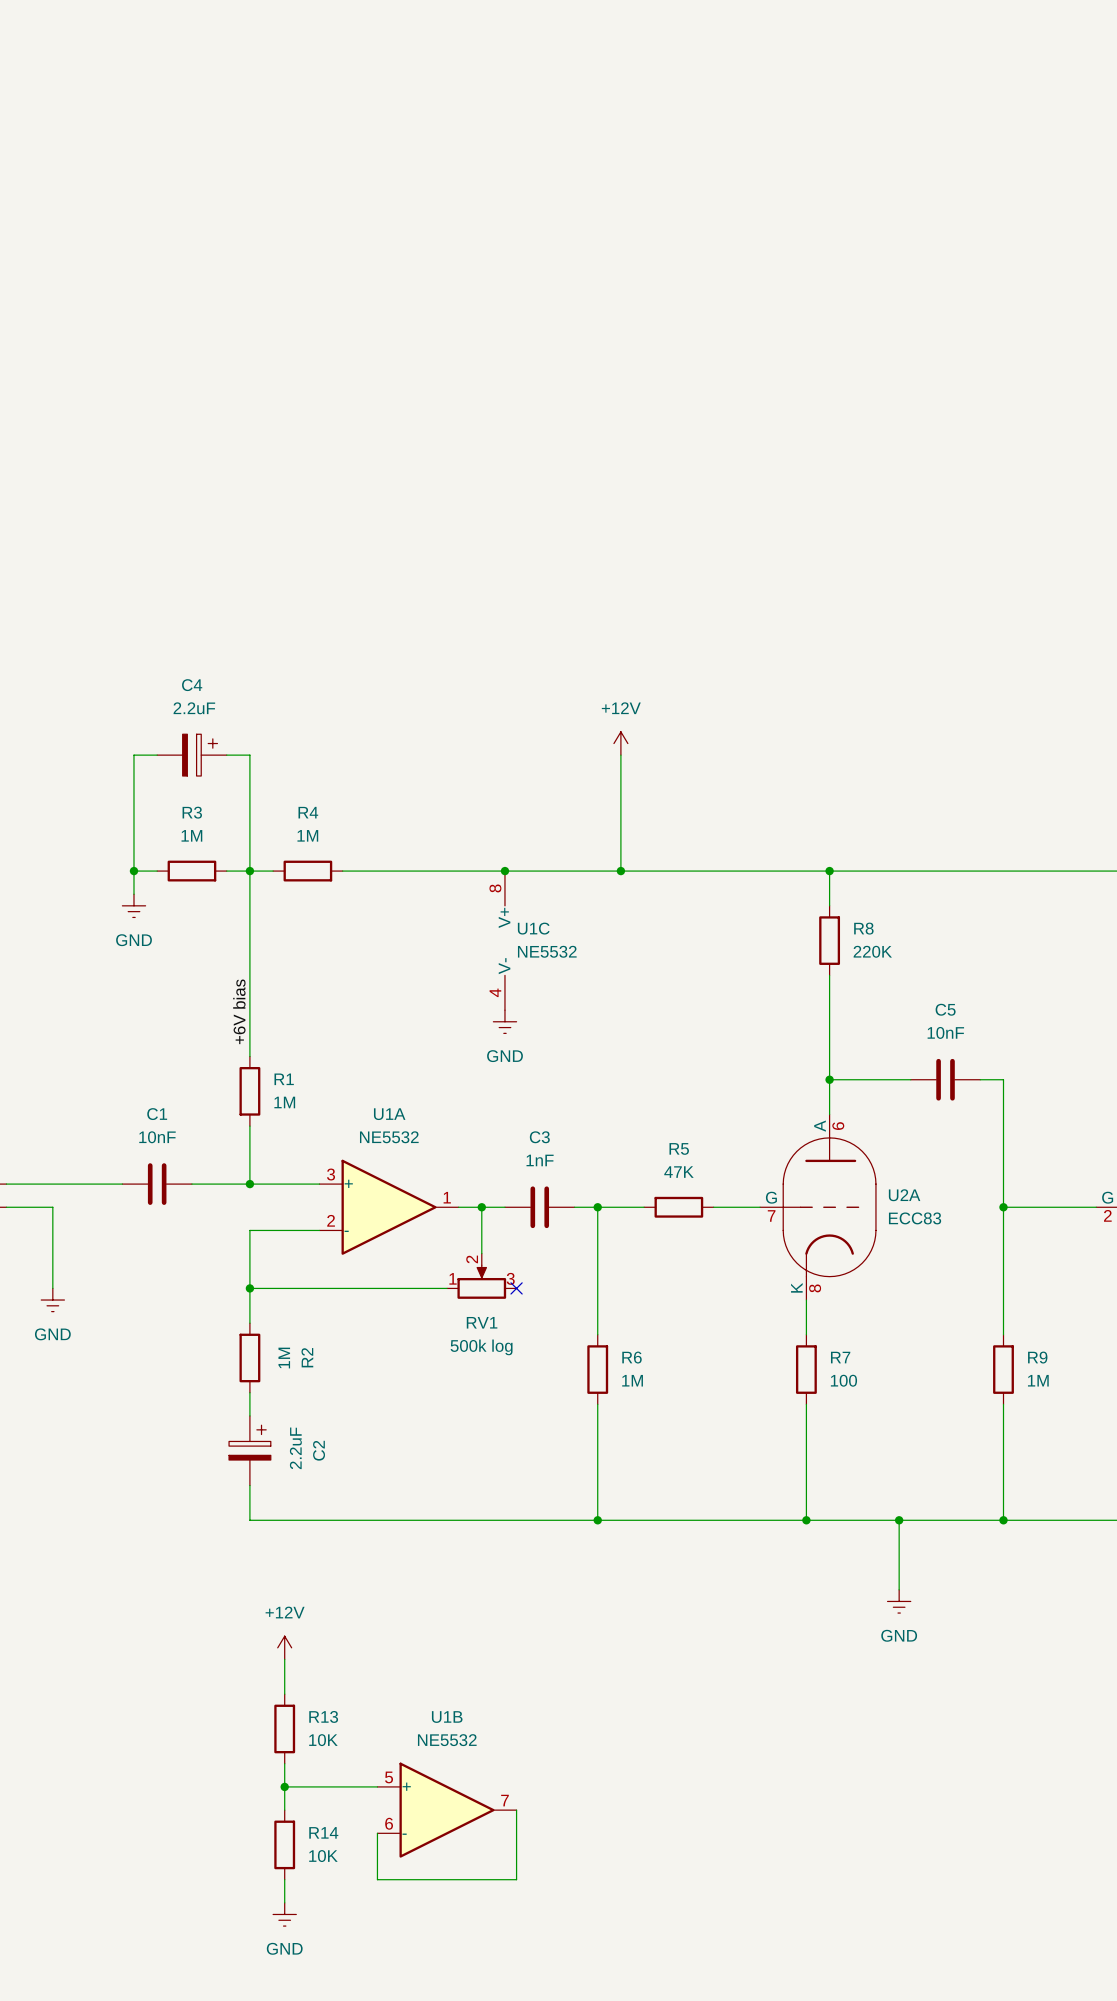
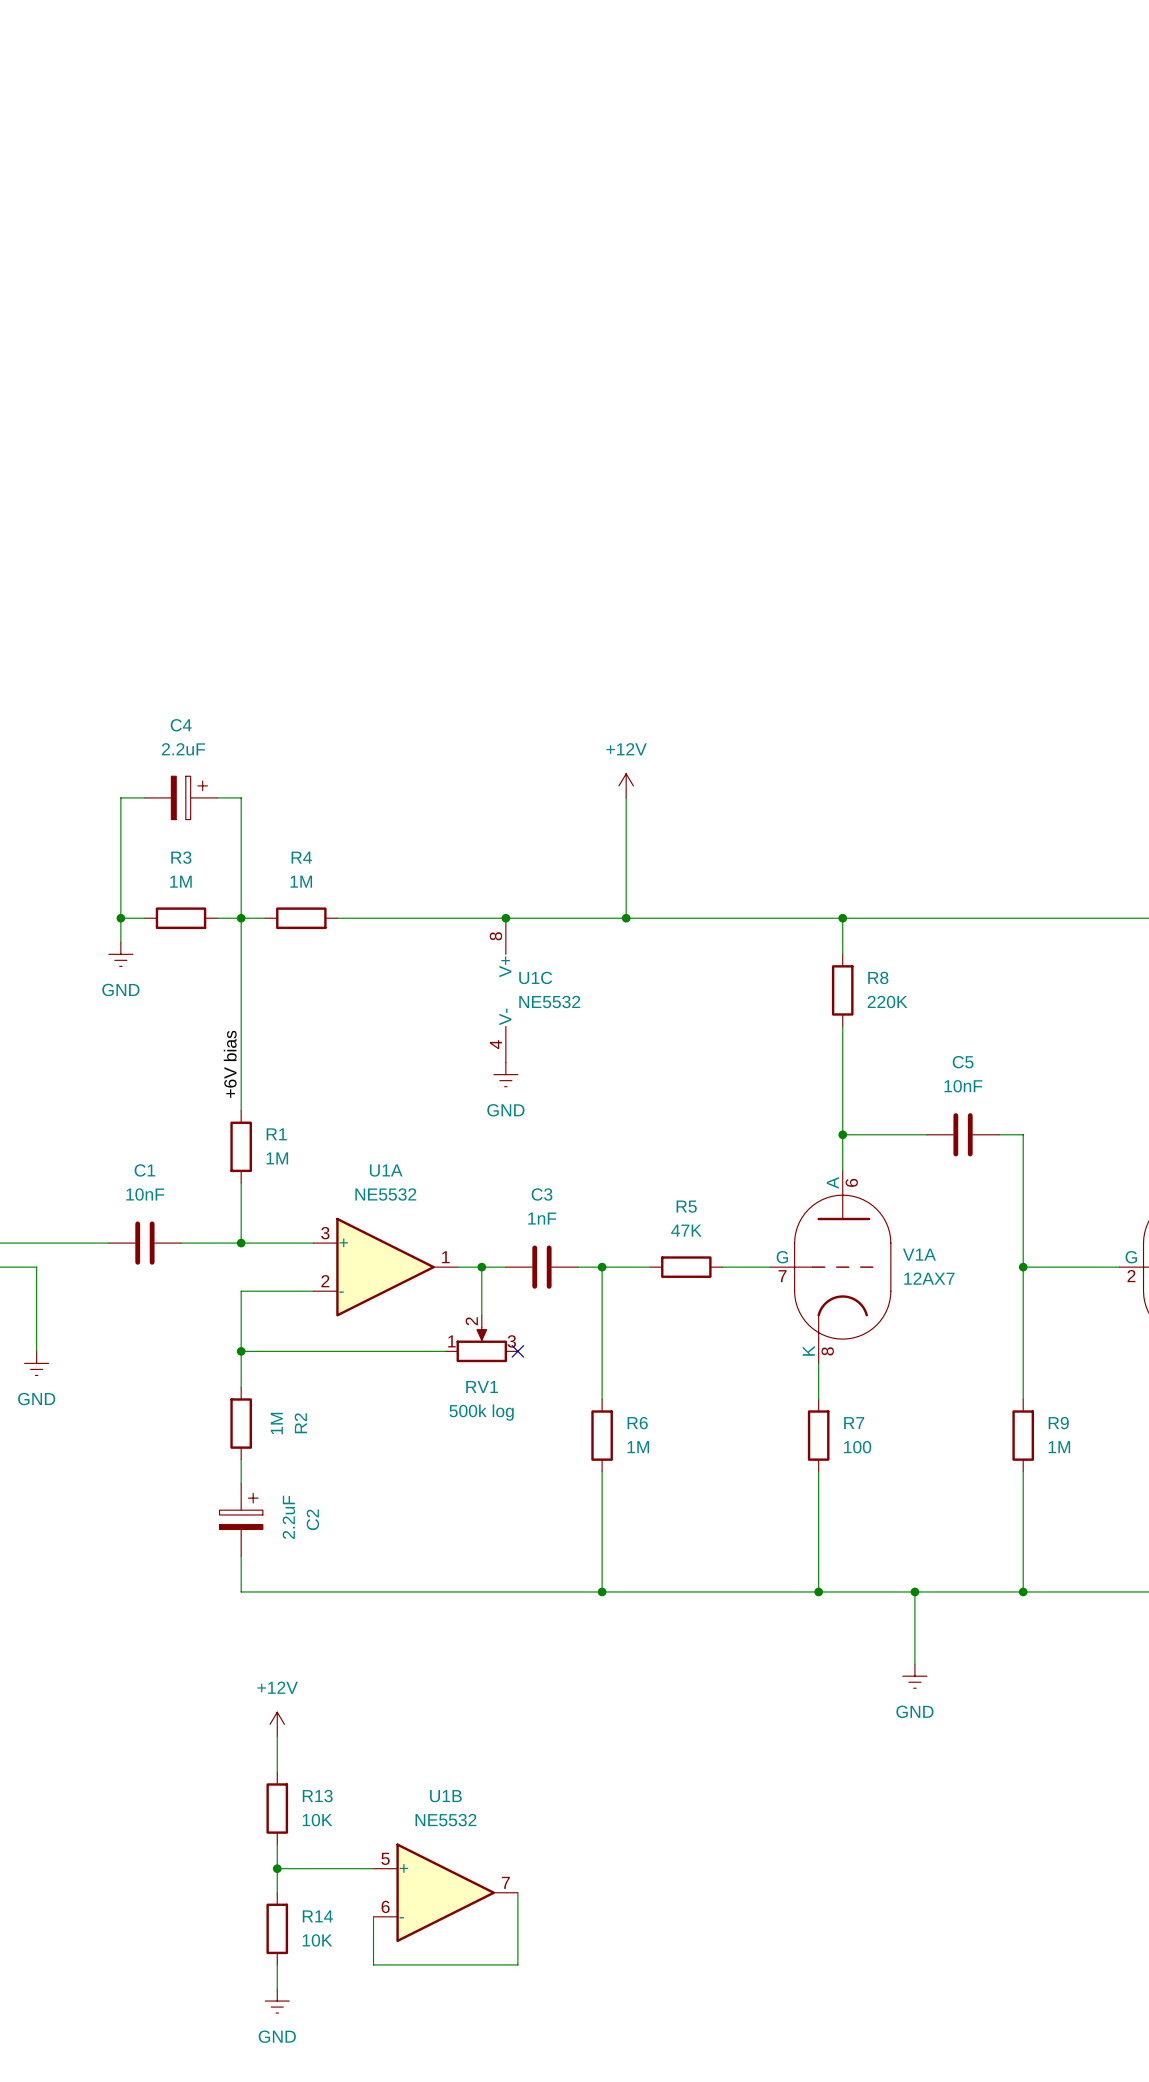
U2A name: U2A (904, 1195) -> V1A (919, 1254)
U2A value: ECC83 (915, 1218) -> 12AX7 (929, 1278)

